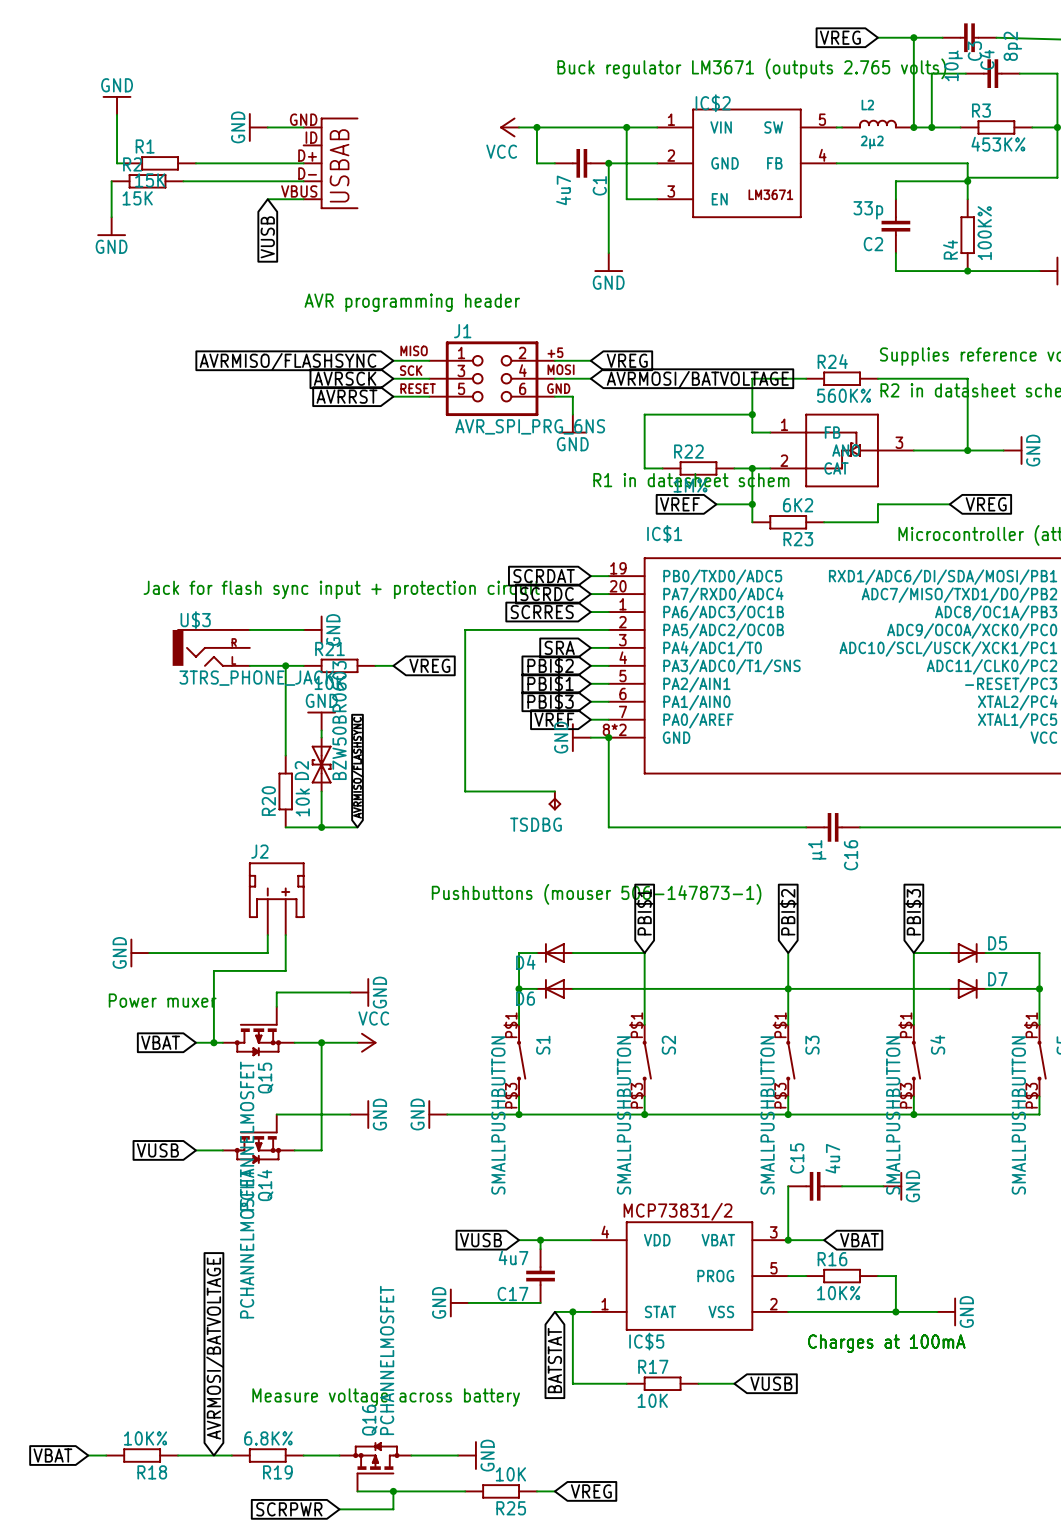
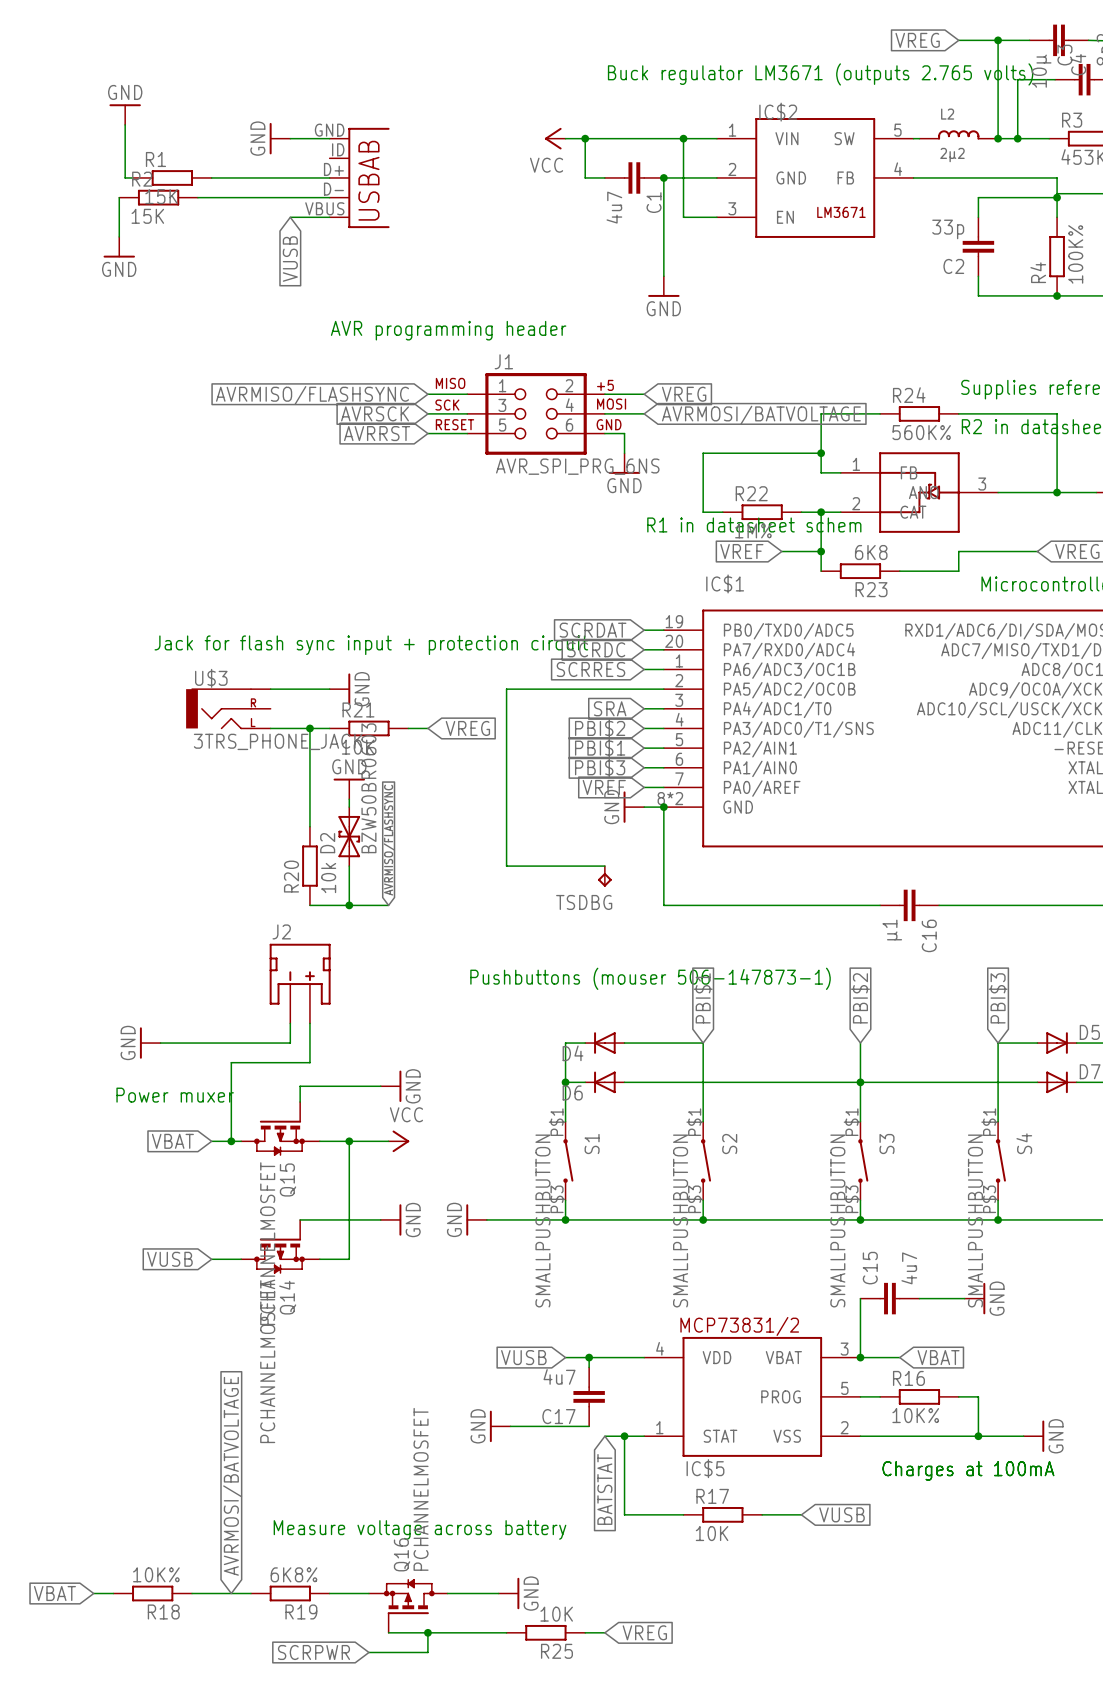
R23 value: 6K2 (798, 505) -> 6K8 (871, 552)
R19 value: 6.8K% (268, 1438) -> 6K8% (294, 1574)

